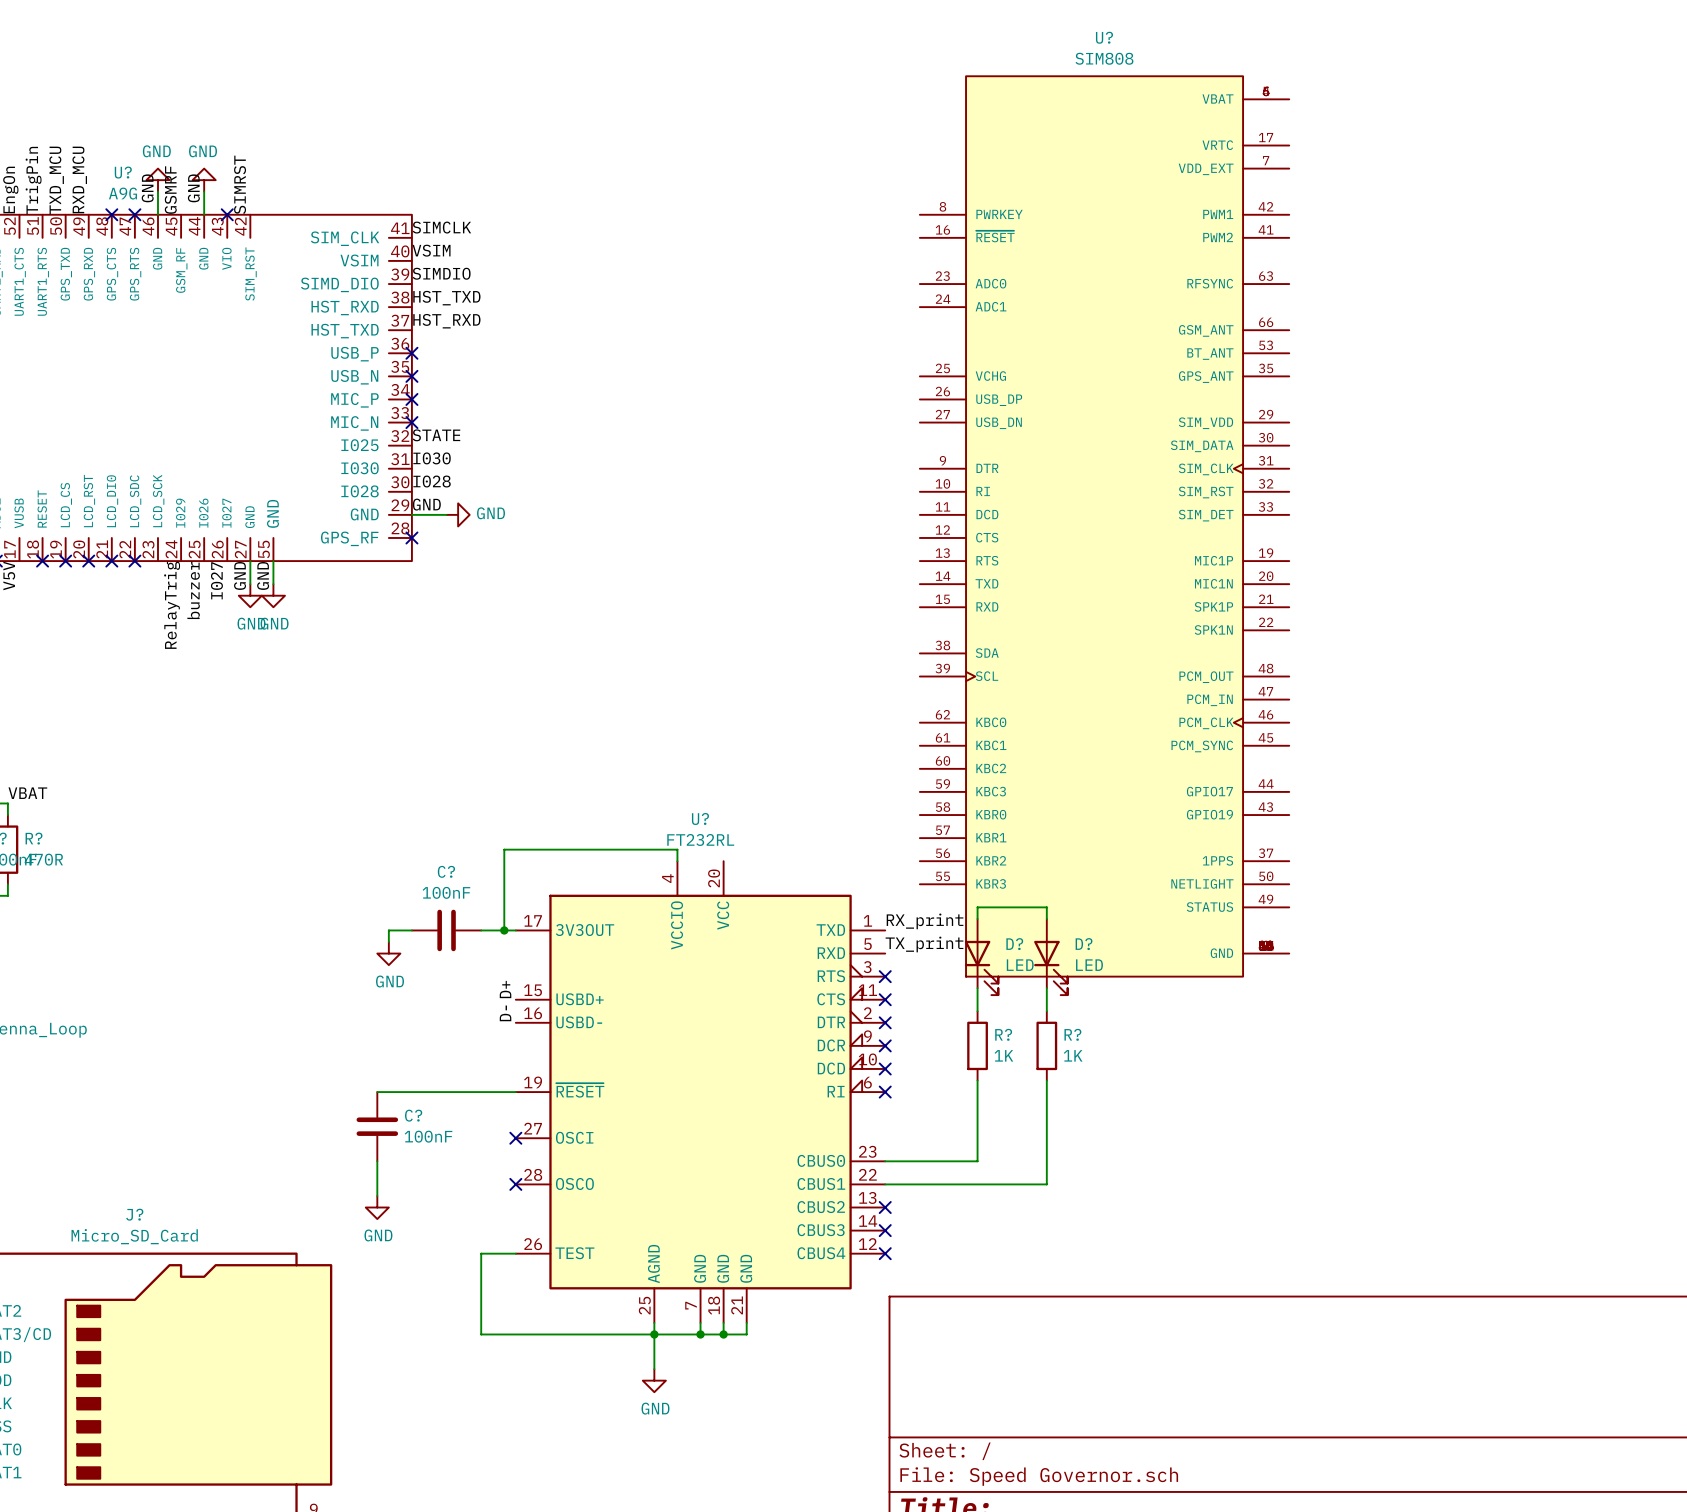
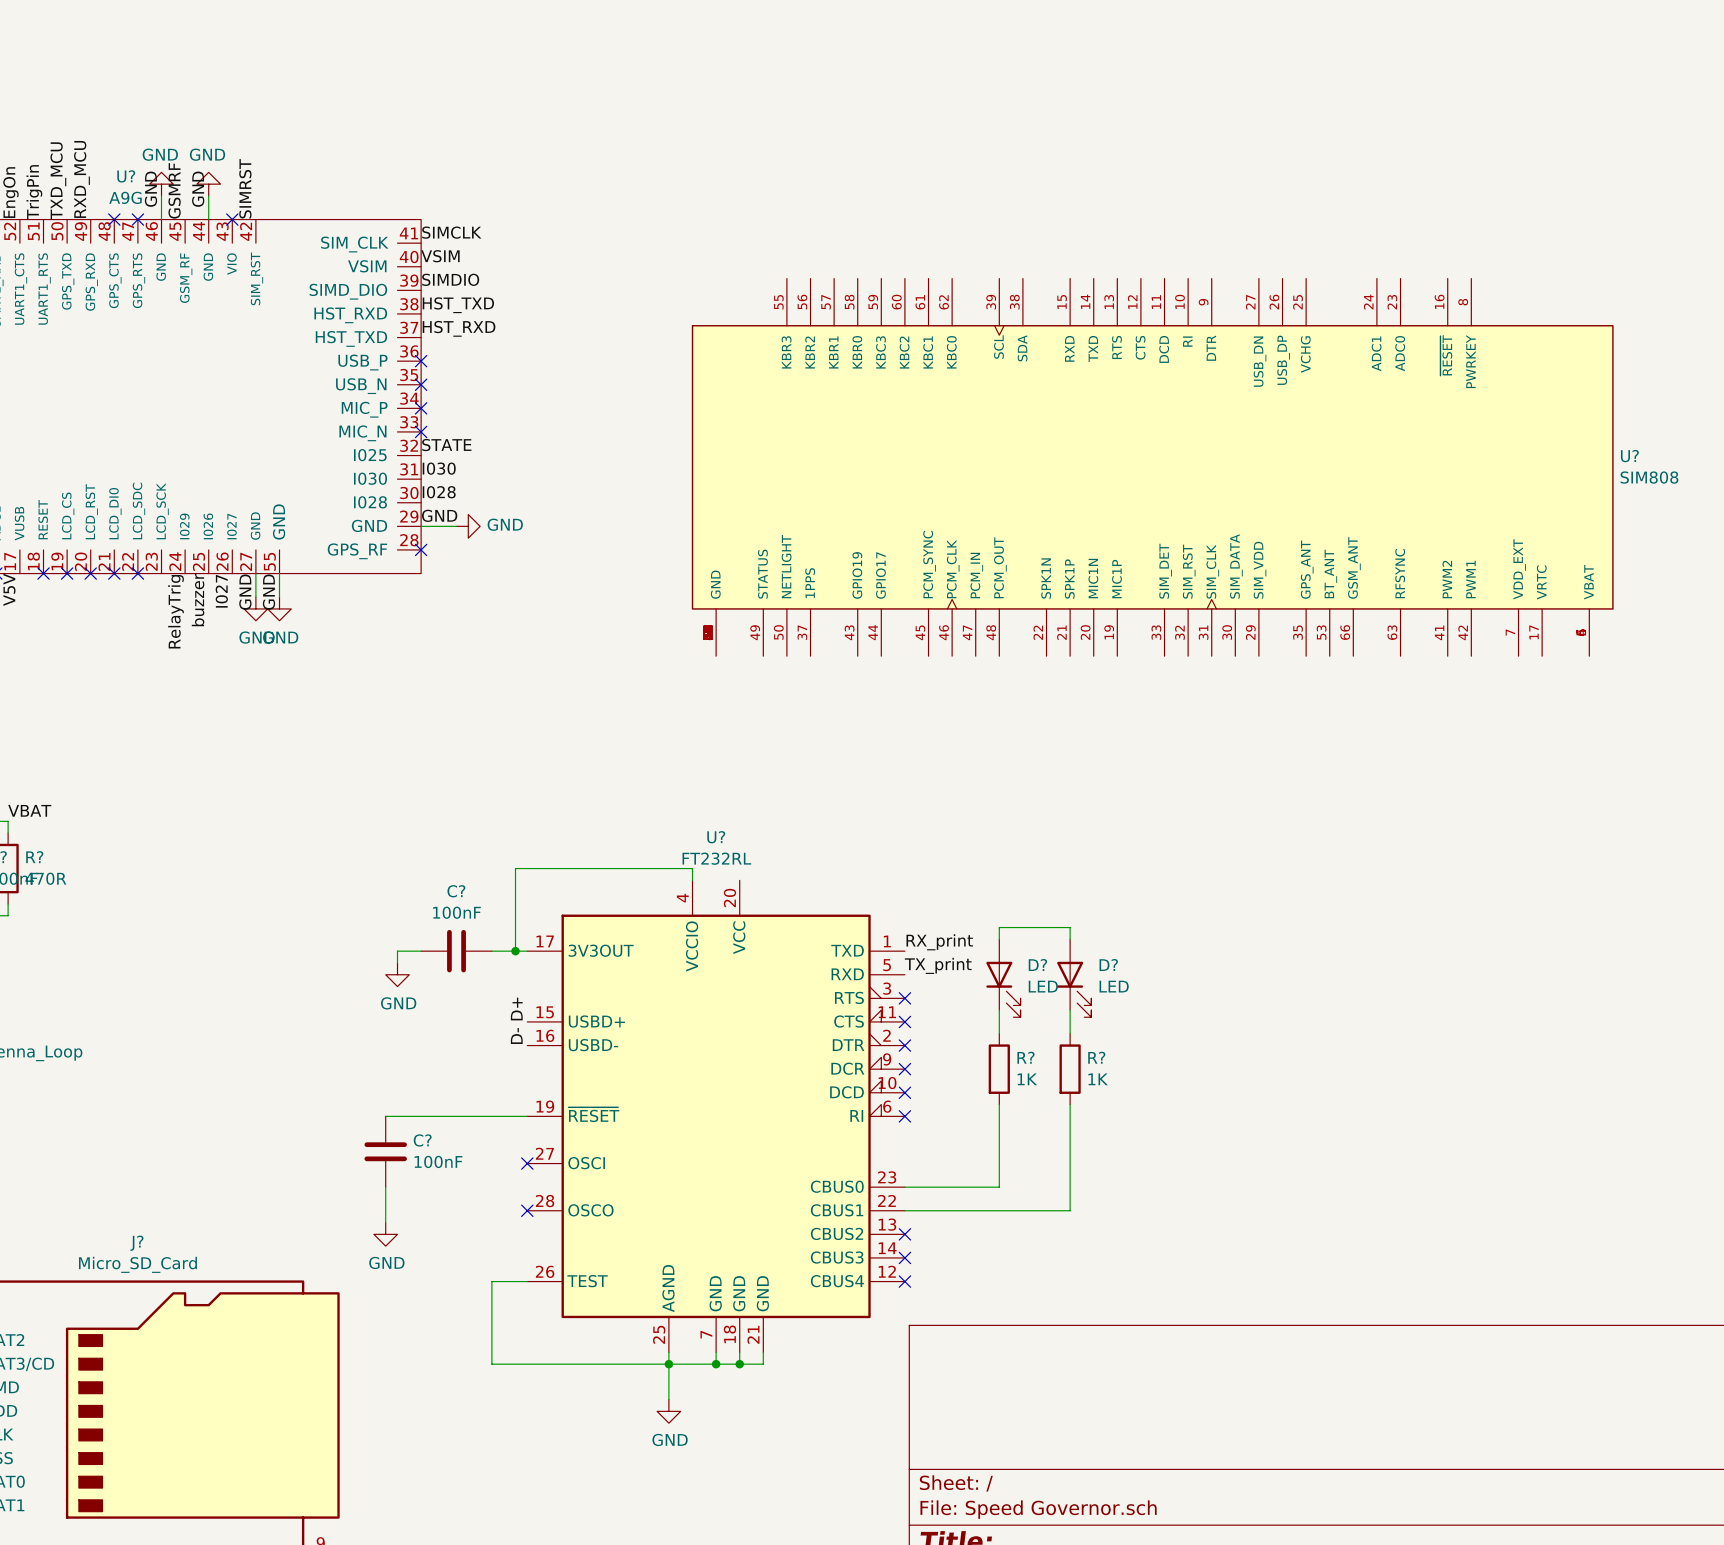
U? name position: U? (1104, 37) -> U? (1629, 456)
U? value position: SIM808 (1104, 58) -> SIM808 (1649, 477)
U? rotation: 0° (1104, 526) -> 90° clockwise (1152, 467)

